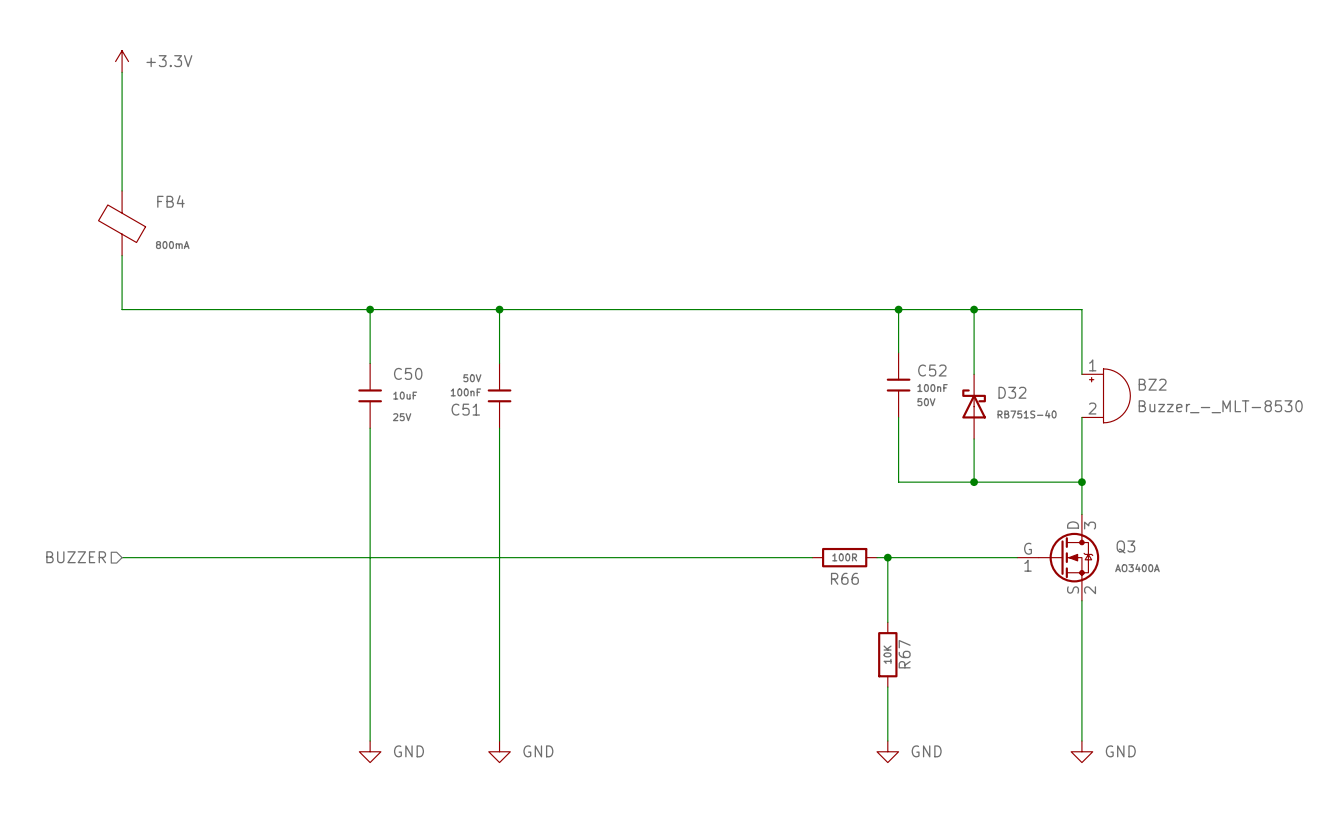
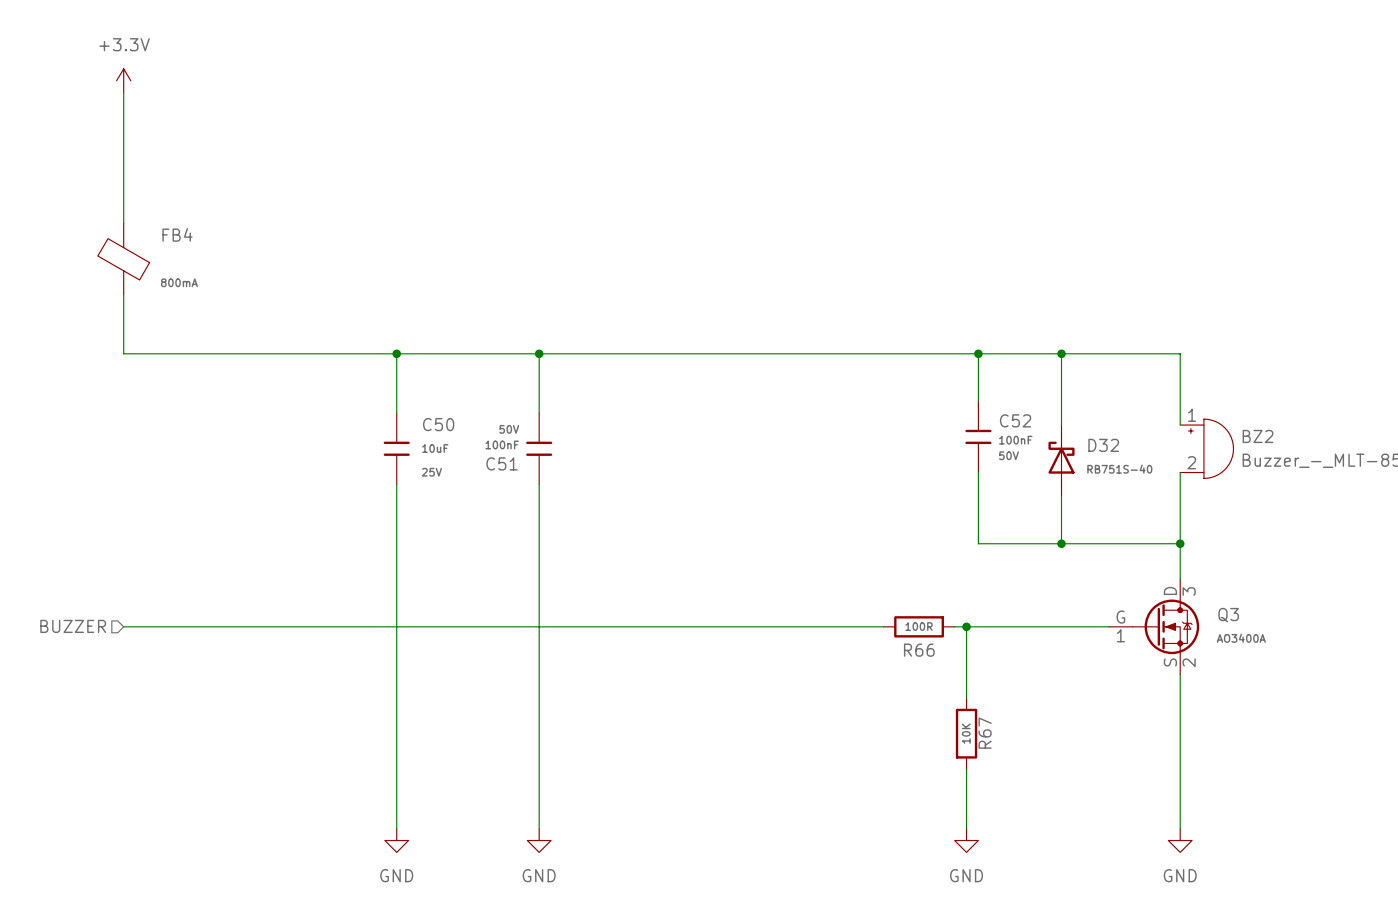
power symbol text position: +3.3V (169, 61) -> +3.3V (124, 44)
power symbol text position: GND (408, 751) -> GND (396, 875)
power symbol text position: GND (538, 751) -> GND (539, 875)
power symbol text position: GND (926, 751) -> GND (966, 875)
power symbol text position: GND (1120, 751) -> GND (1180, 875)

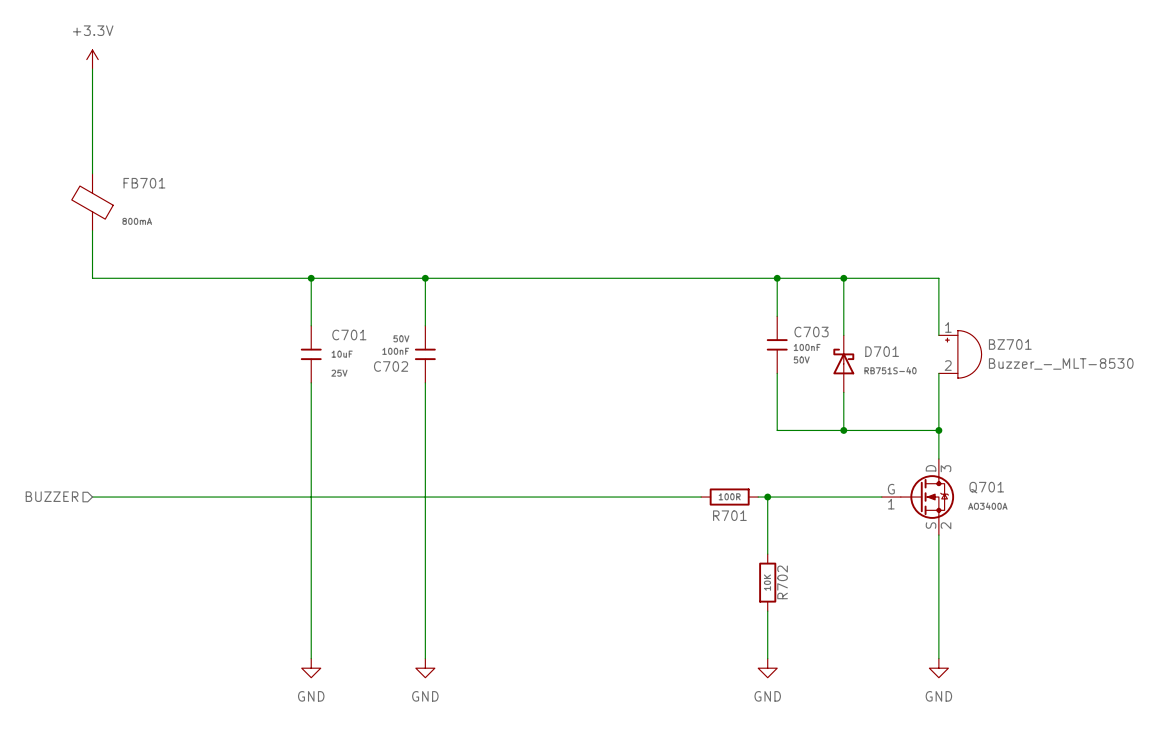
FB4 name: FB4 (177, 234) -> FB701 (144, 183)
C52 name: C52 (1015, 420) -> C703 (811, 332)
C50 name: C50 (438, 424) -> C701 (349, 335)
BZ2 name: BZ2 (1258, 436) -> BZ701 (1010, 344)
D32 name: D32 (1103, 445) -> D701 (882, 351)
C51 name: C51 (502, 463) -> C702 (391, 366)
Q3 name: Q3 (1228, 615) -> Q701 (986, 487)
R66 name: R66 (919, 650) -> R701 (729, 515)
R67 name: R67 (985, 733) -> R702 (782, 582)

